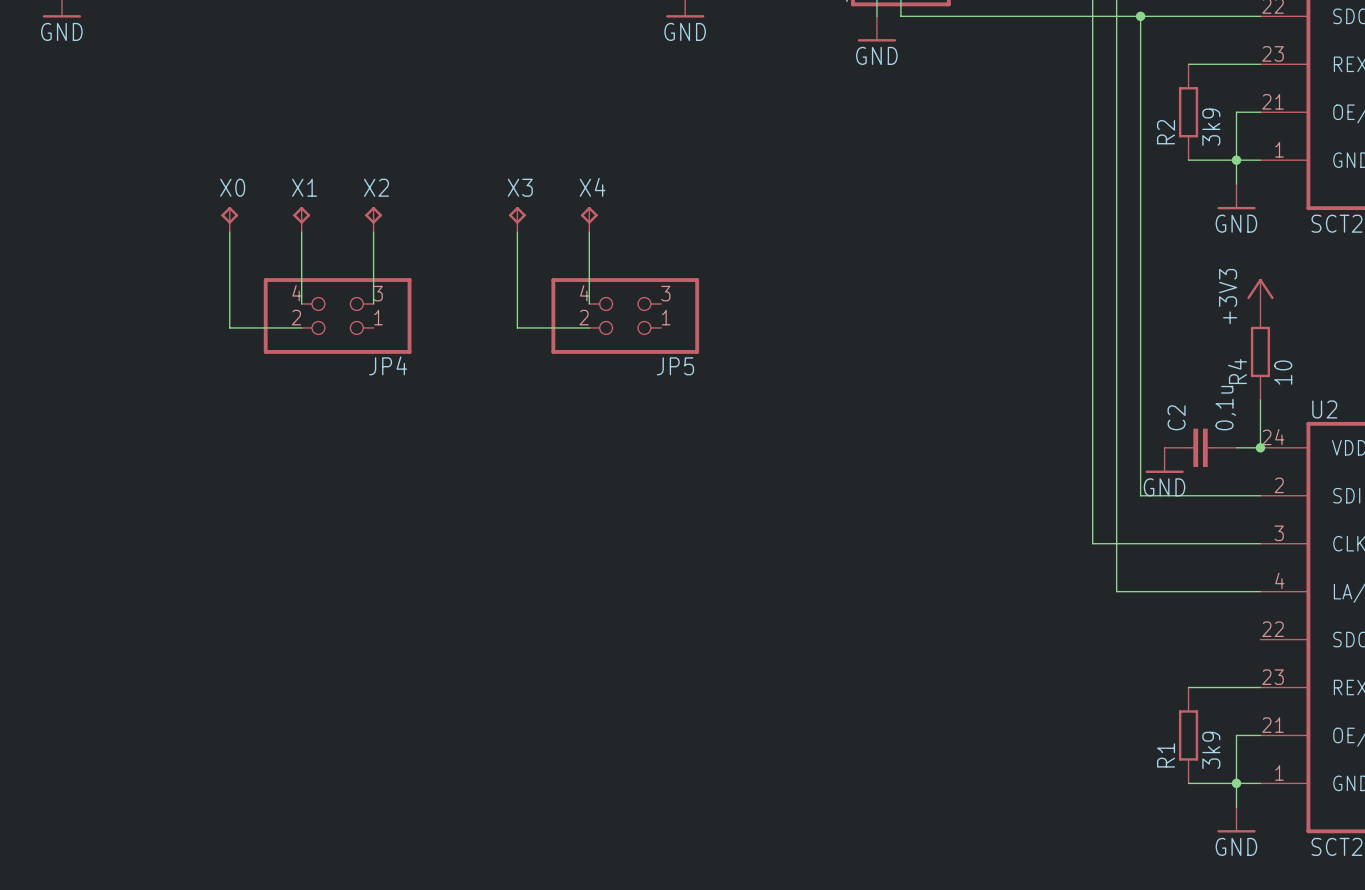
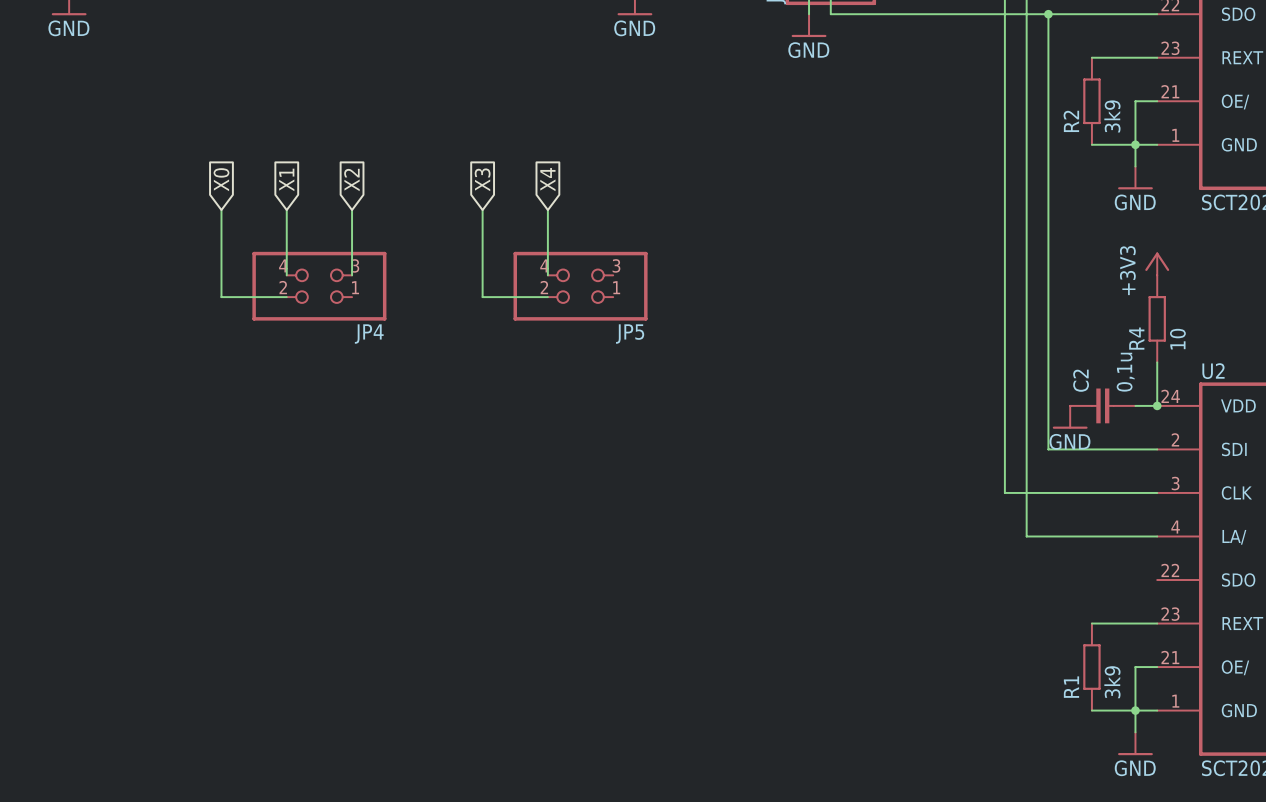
global label: none -> X4 (547, 179)
global label: none -> X0 (221, 179)
global label: none -> X1 (286, 179)
global label: none -> X2 (351, 180)
global label: none -> X3 (482, 179)
X0: (229, 219) -> none
X1: (301, 219) -> none
X2: (373, 219) -> none
X3: (517, 219) -> none
X4: (589, 219) -> none

